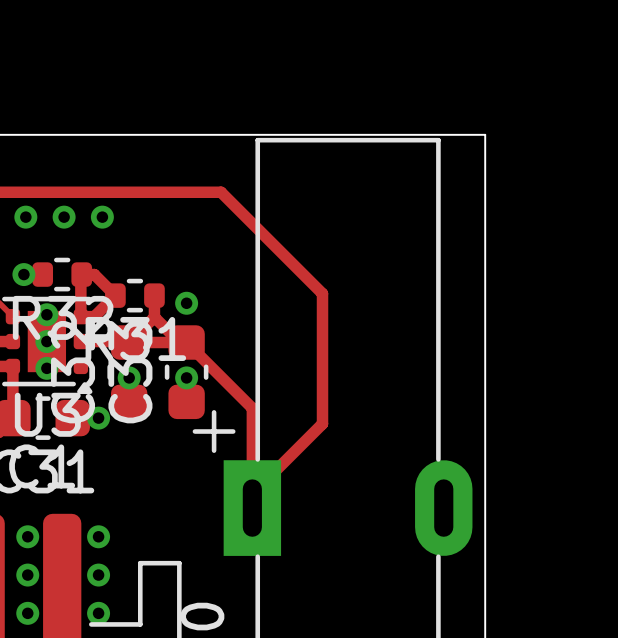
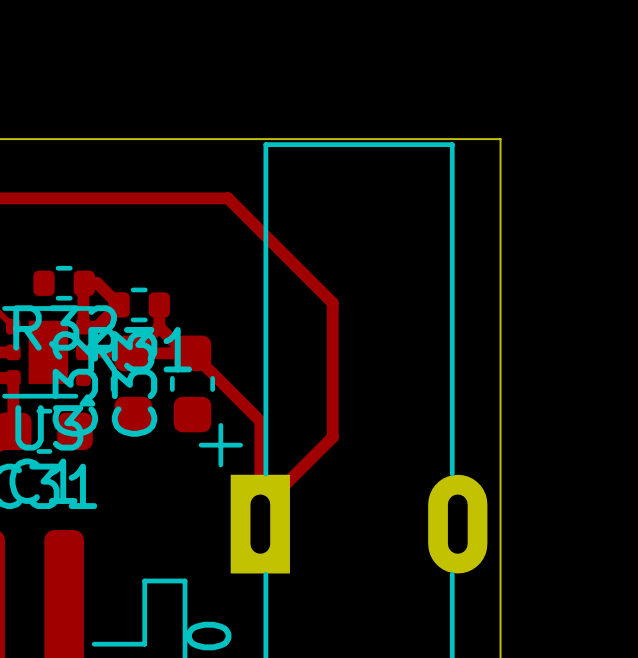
via: (25, 217) -> none
via: (64, 217) -> none
via: (102, 217) -> none
via: (23, 274) -> none
via: (186, 303) -> none
via: (46, 314) -> none
via: (46, 341) -> none
via: (46, 368) -> none
via: (129, 377) -> none
via: (186, 377) -> none
via: (98, 418) -> none
via: (27, 536) -> none
via: (98, 536) -> none
via: (27, 575) -> none
via: (98, 575) -> none
via: (27, 613) -> none
via: (98, 613) -> none

